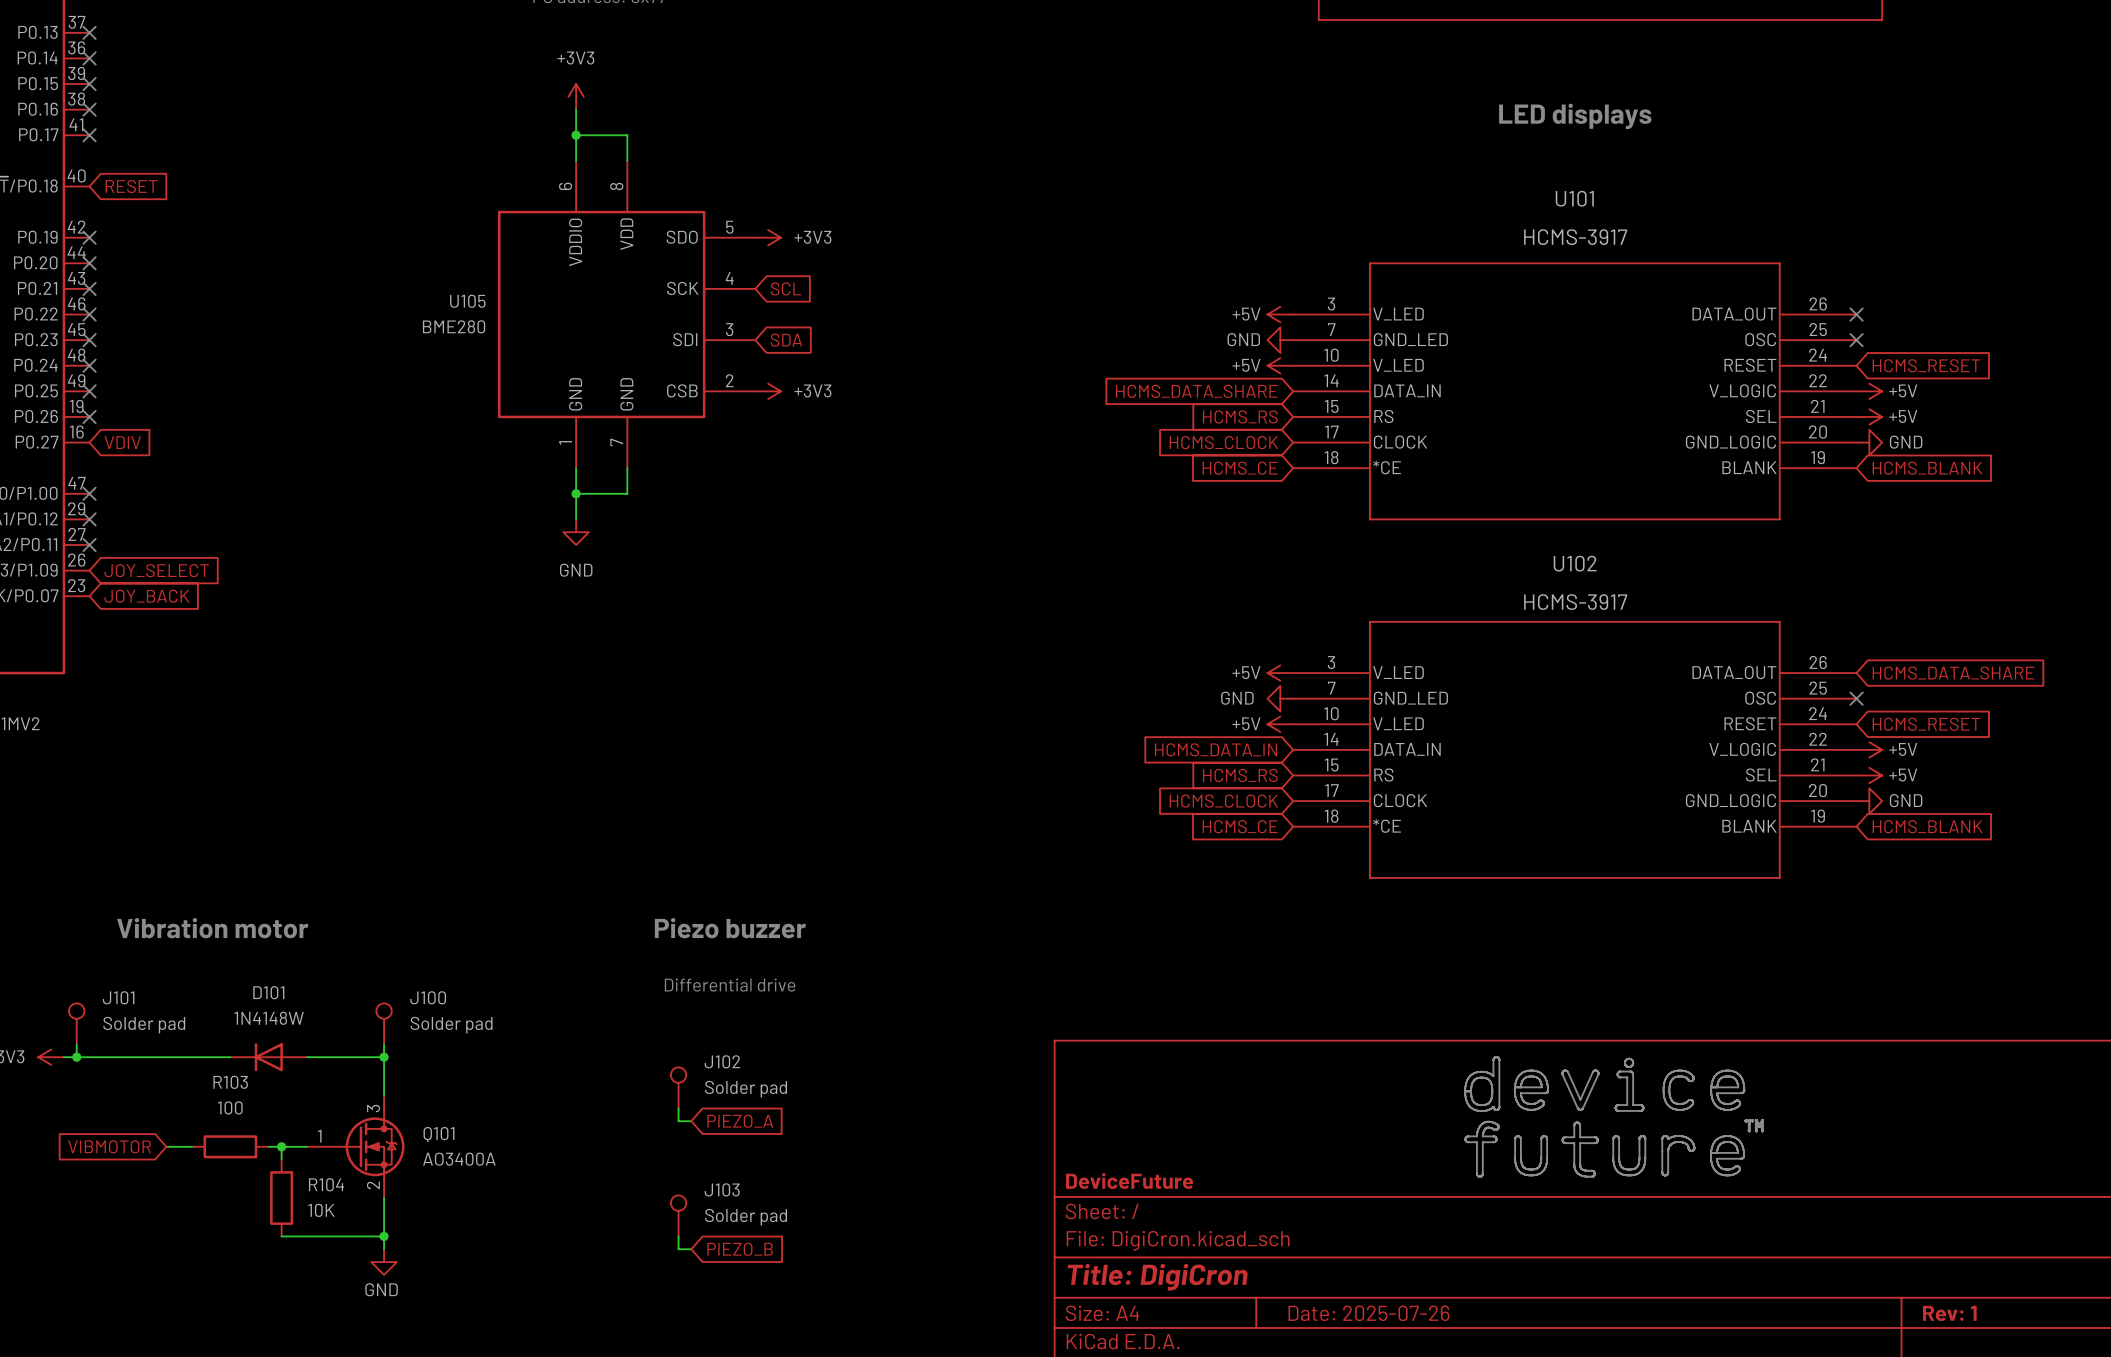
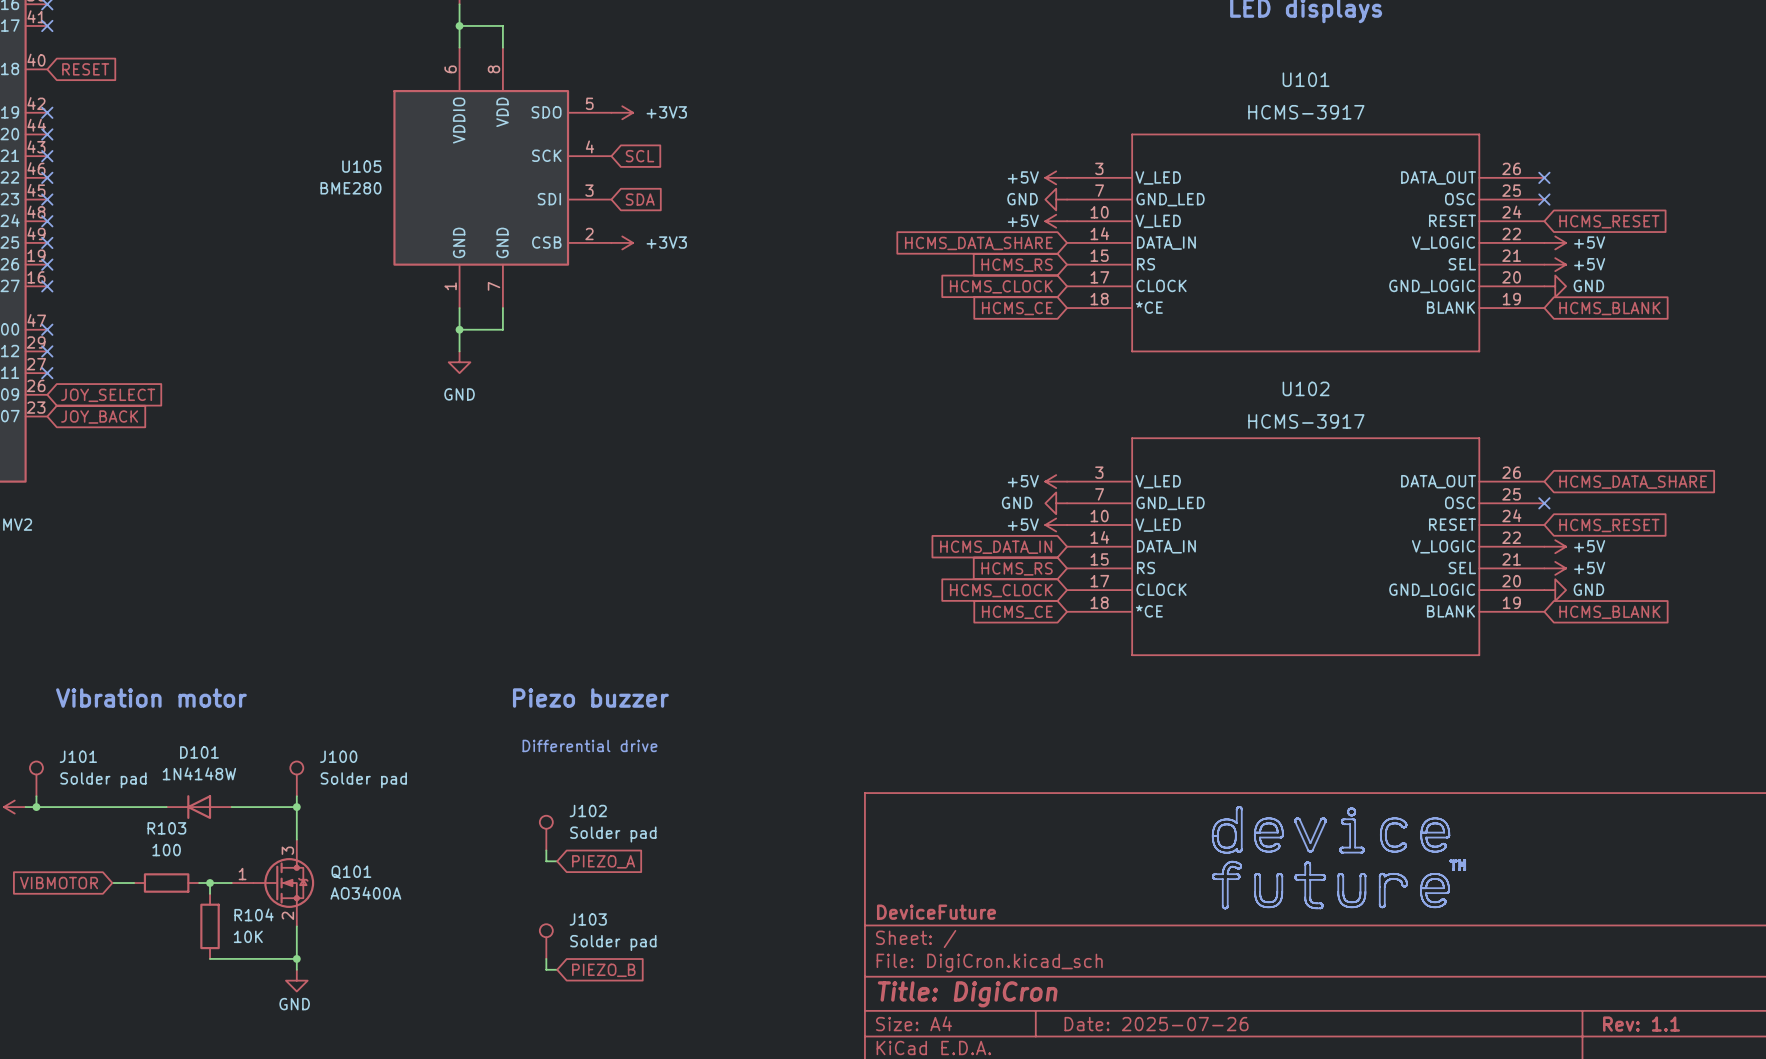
no-connect mark: none -> (47, 286)
global label: VDIV (122, 442) -> none
title block: Rev: 1 (1949, 1313) -> Rev: 1.1 (1641, 1024)

